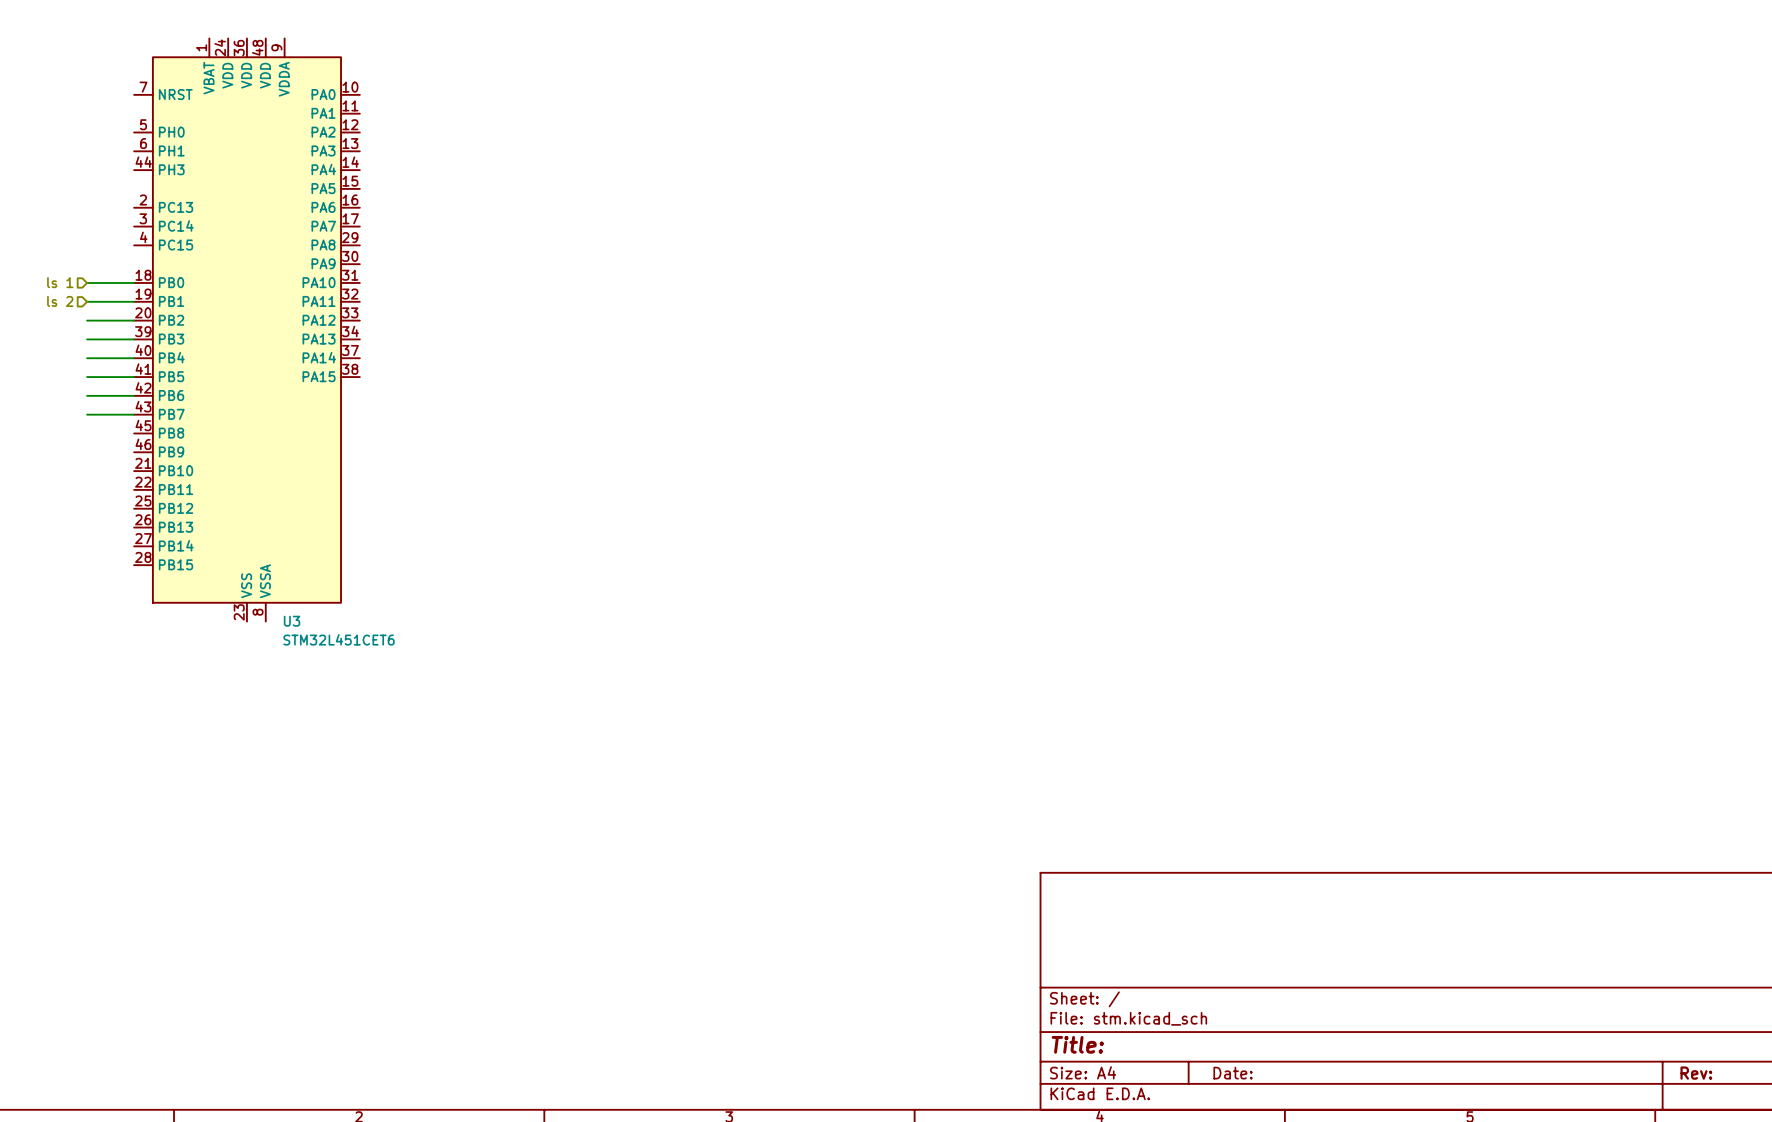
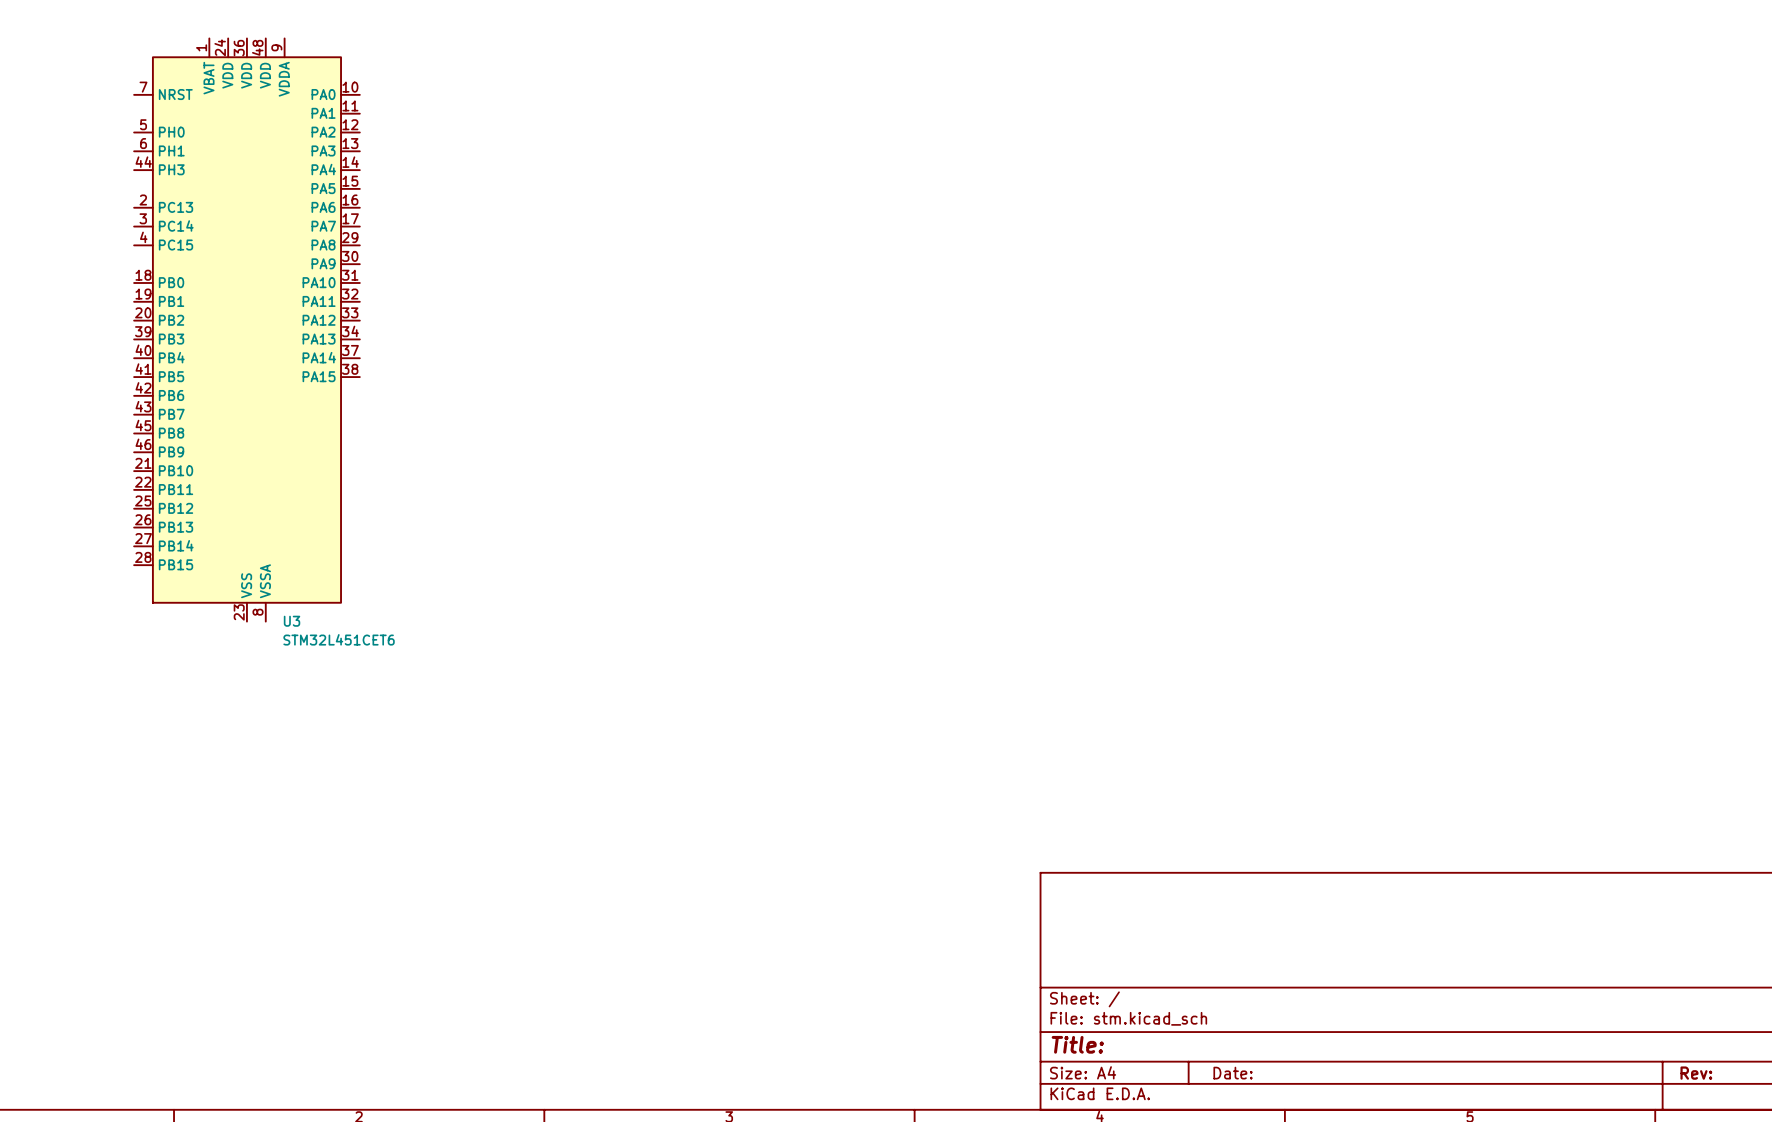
hierarchical label: ls 1 (60, 282) -> none
wire: (87, 282) (134, 282) -> none
hierarchical label: ls 2 (60, 301) -> none
wire: (87, 301) (134, 301) -> none
wire: (87, 320) (134, 320) -> none
wire: (87, 339) (134, 339) -> none
wire: (87, 358) (134, 358) -> none
wire: (87, 377) (134, 377) -> none
wire: (87, 395) (134, 395) -> none
wire: (87, 414) (134, 414) -> none

